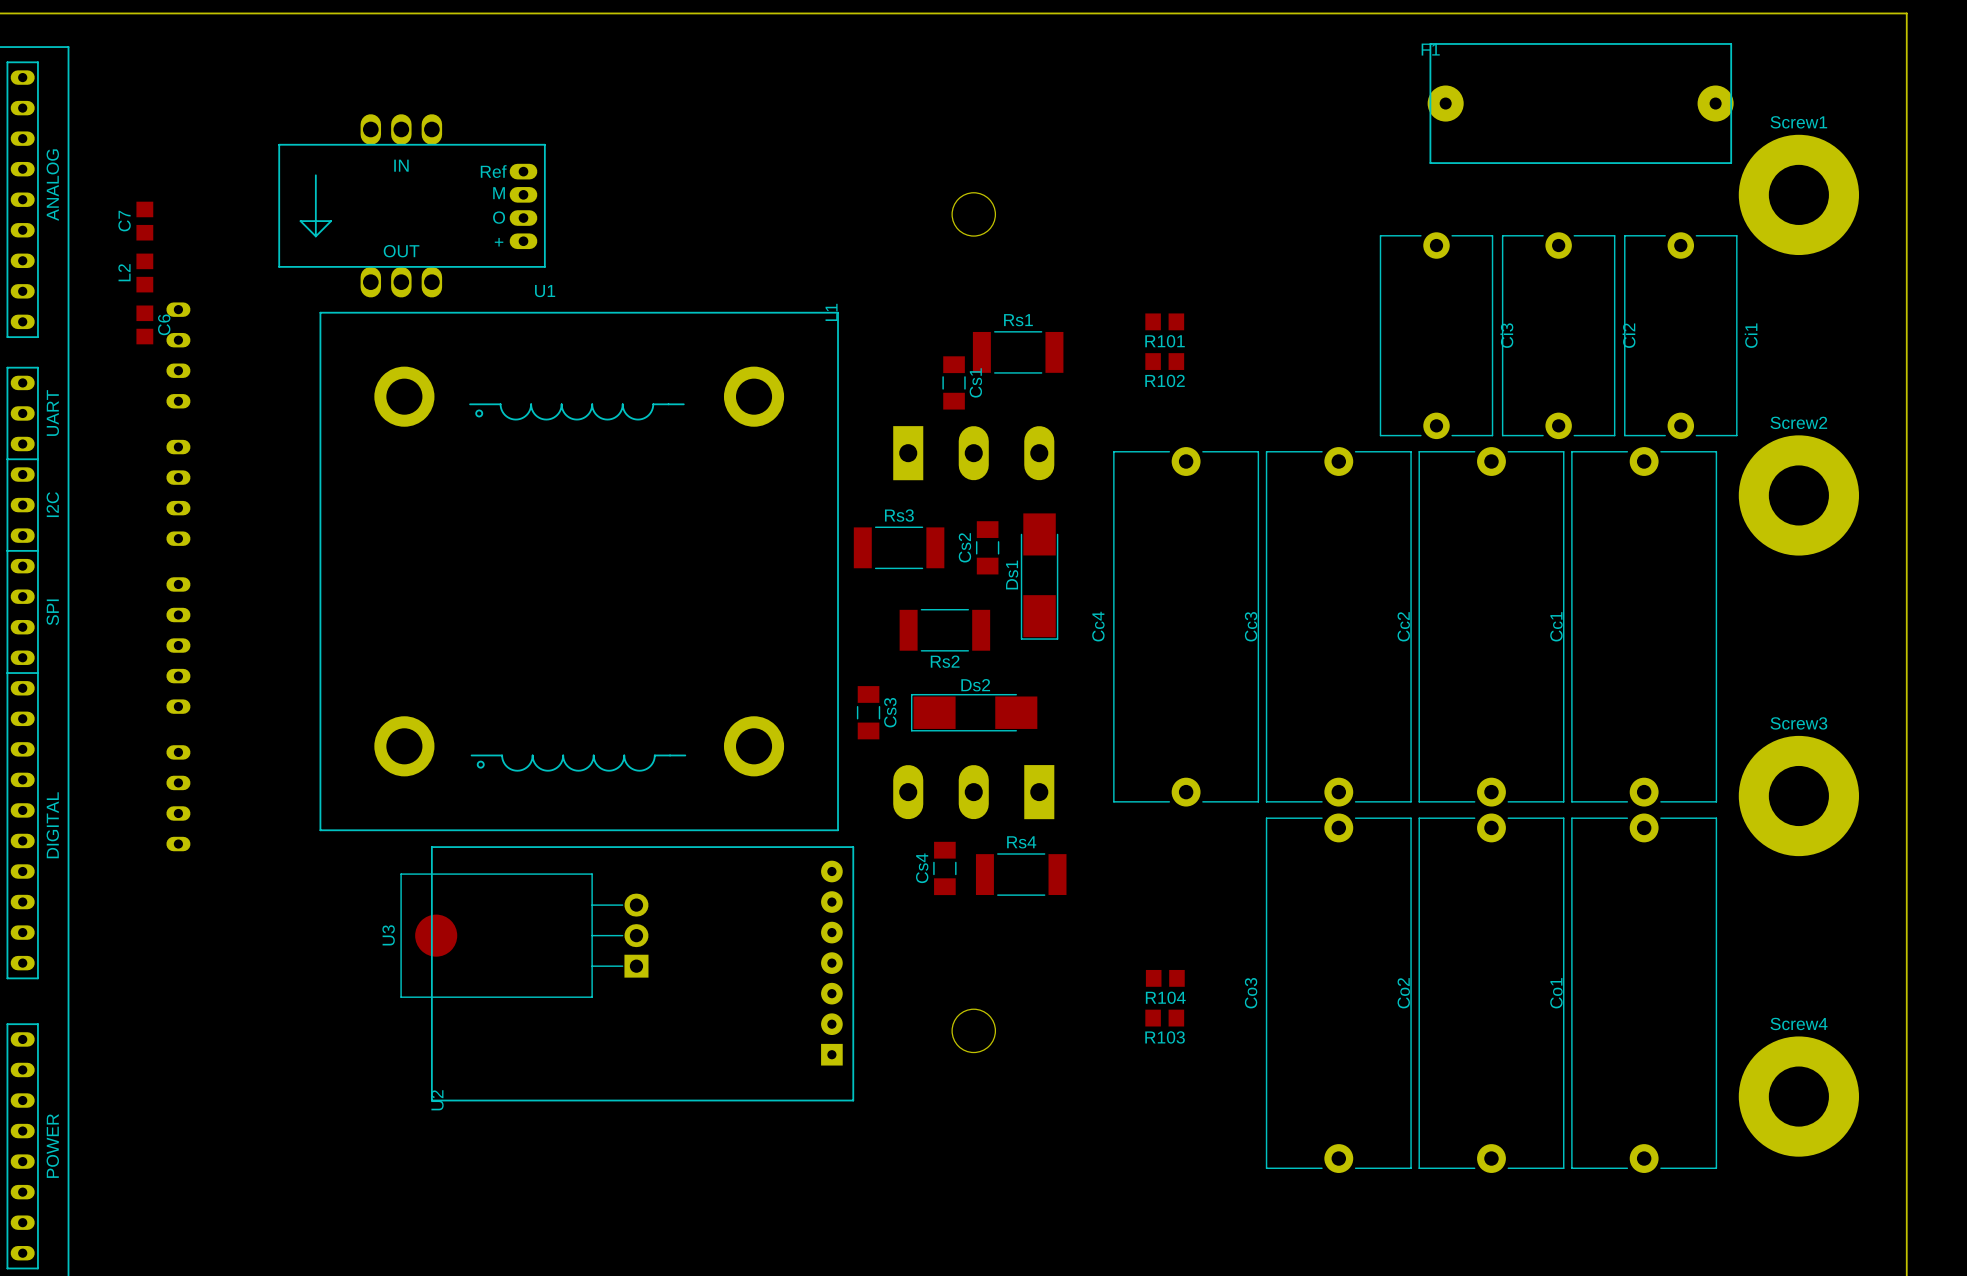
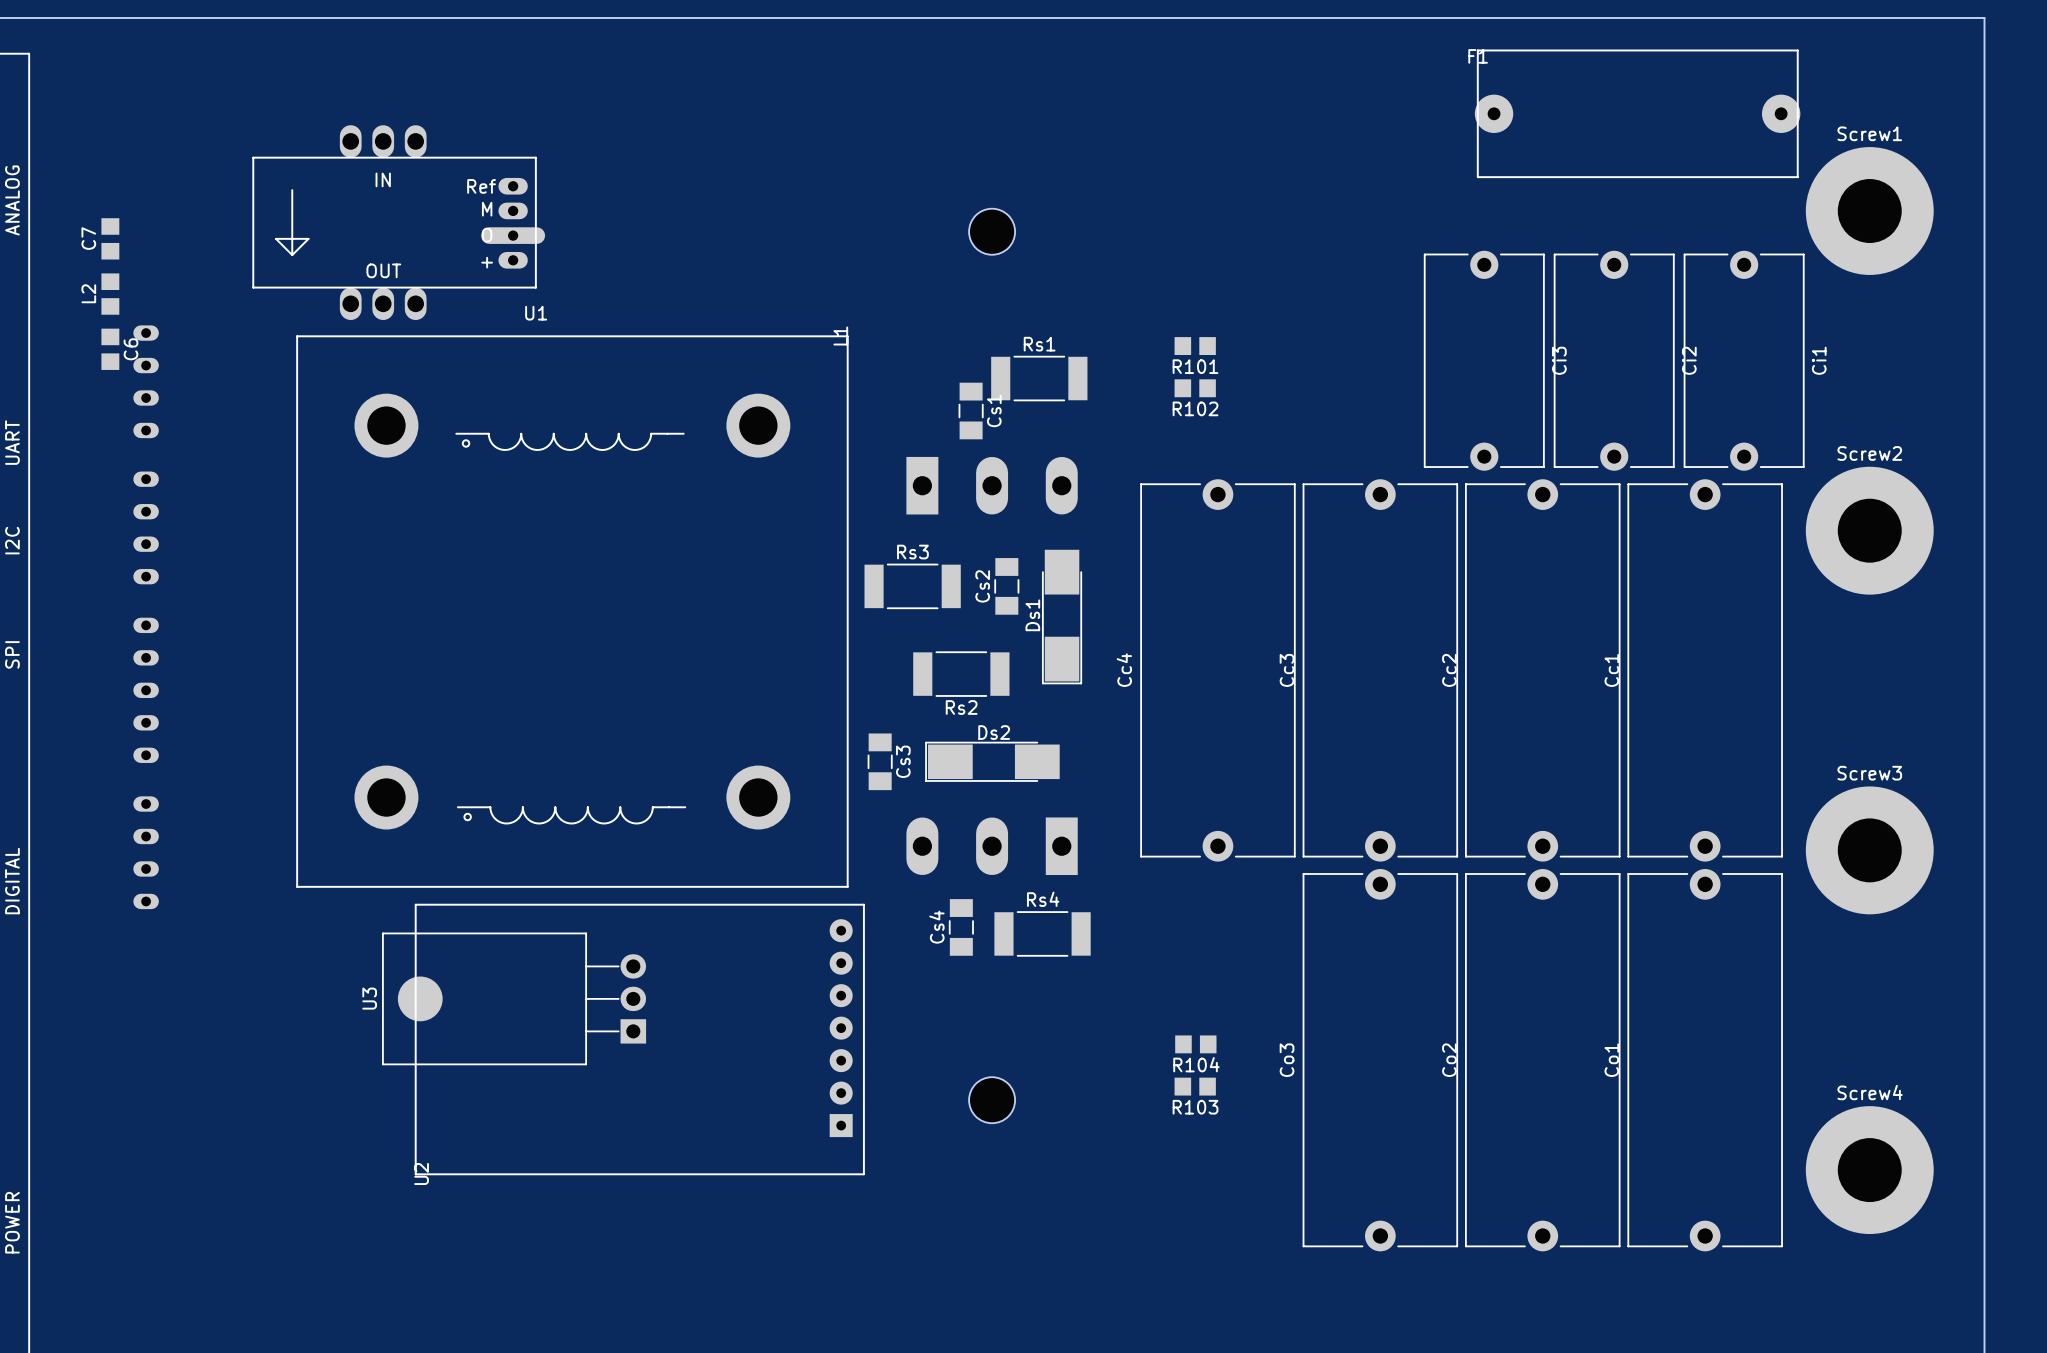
U1 footprint: [278, 114, 546, 298] -> [252, 125, 546, 321]

